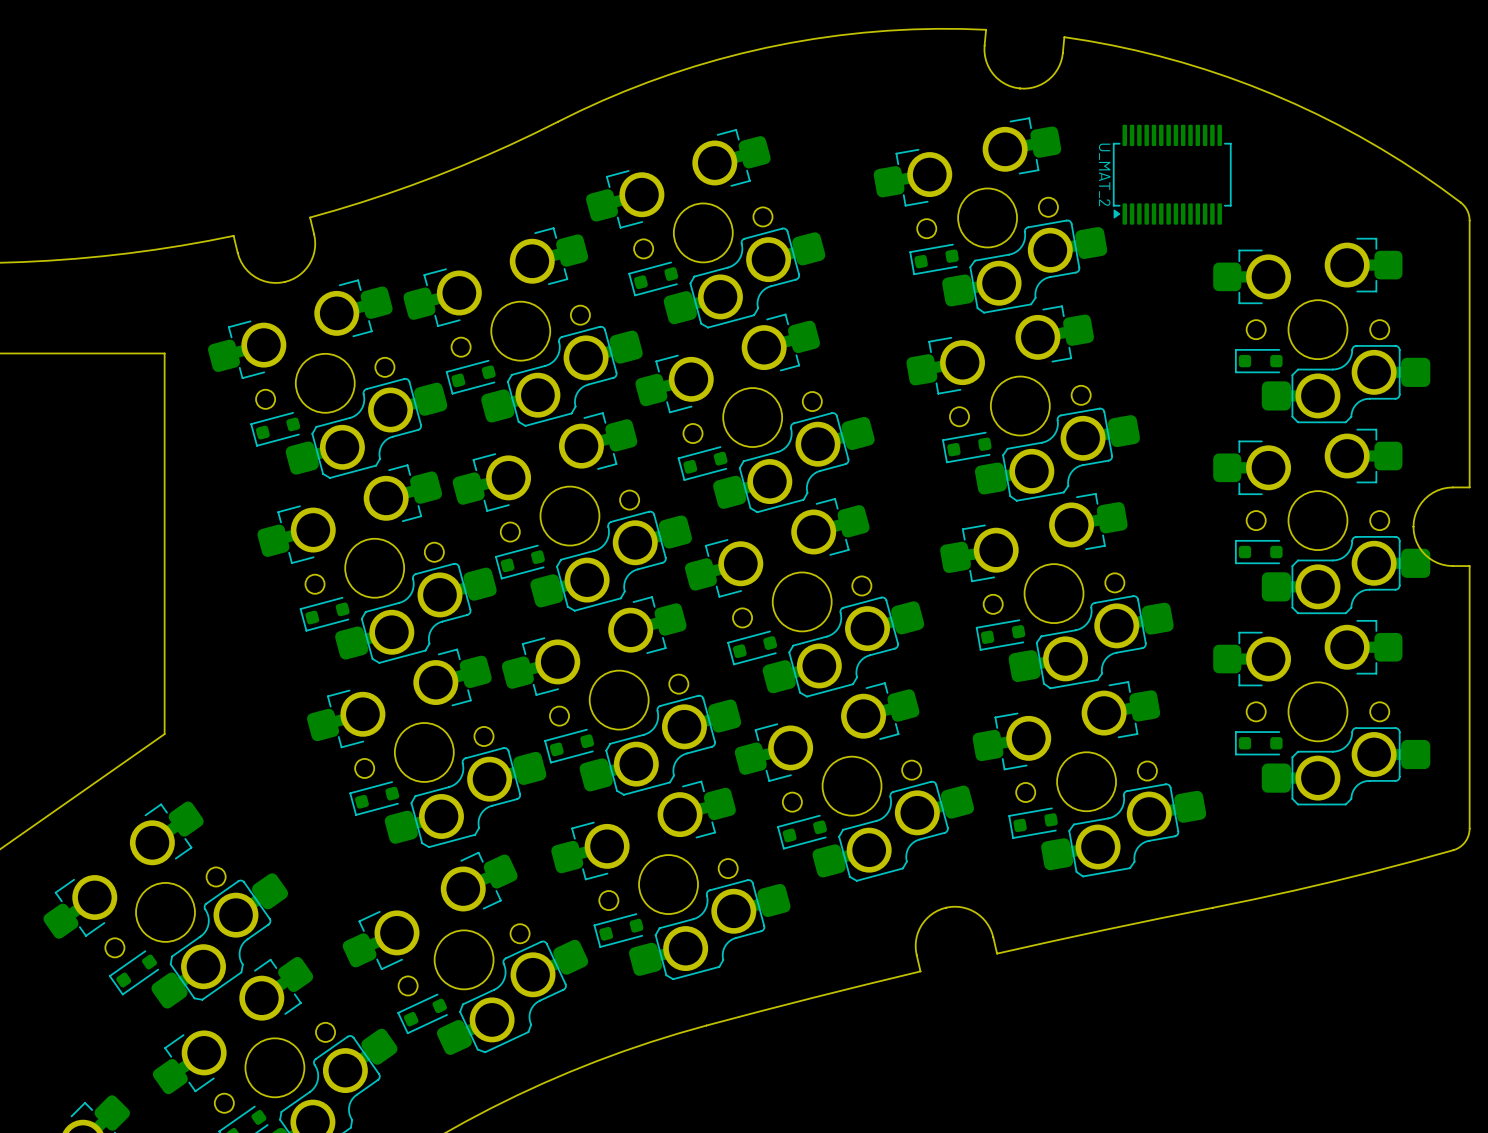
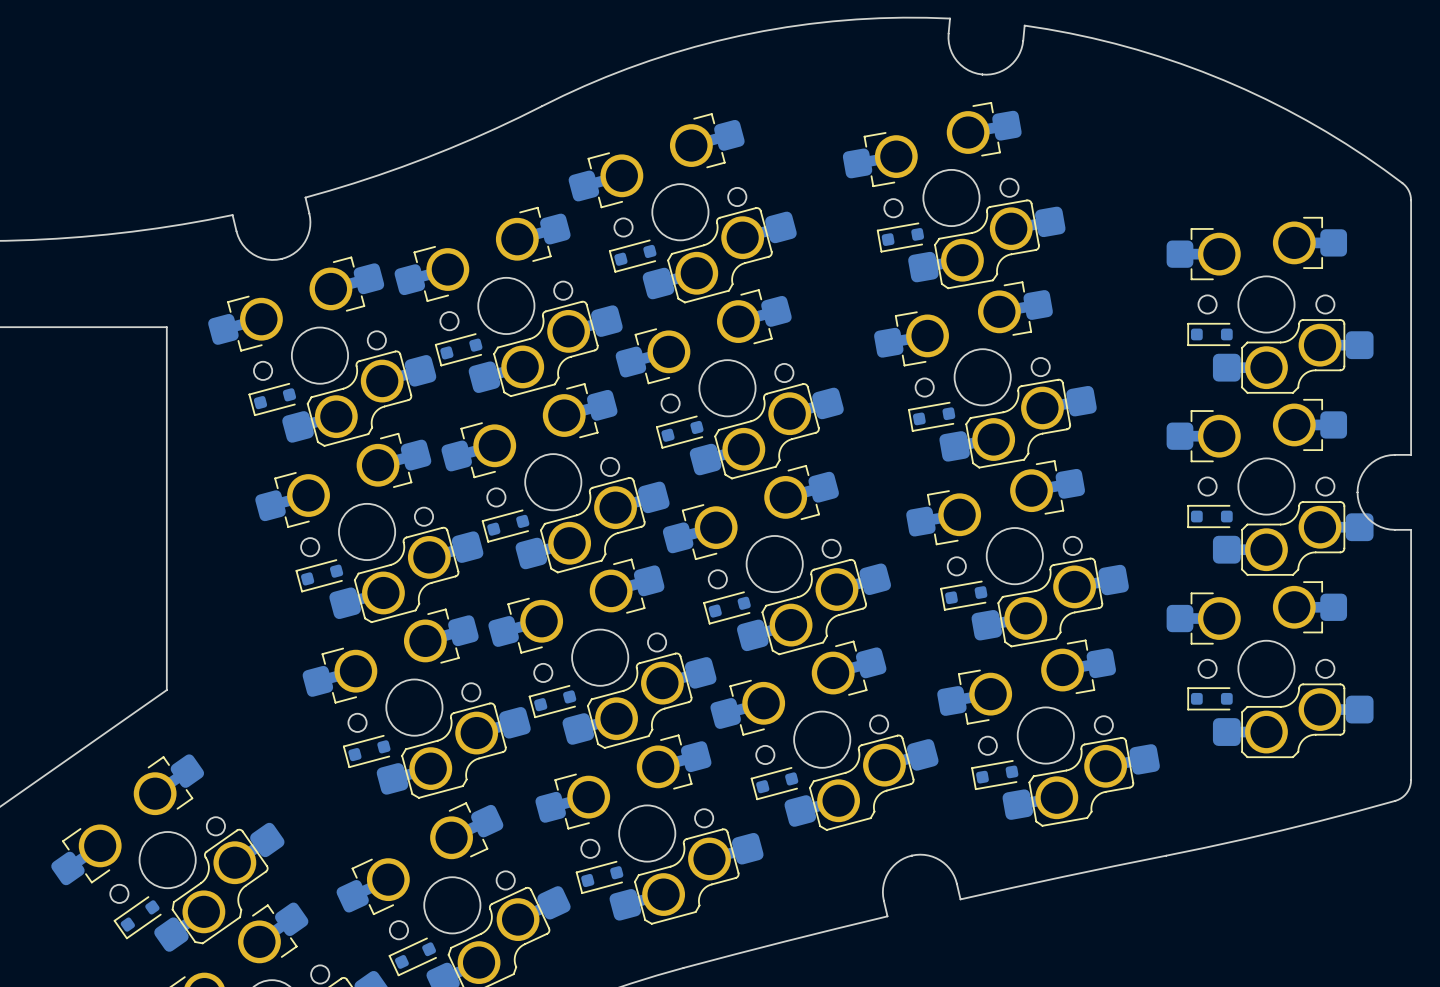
U_MAT_2: (1172, 174) -> none

